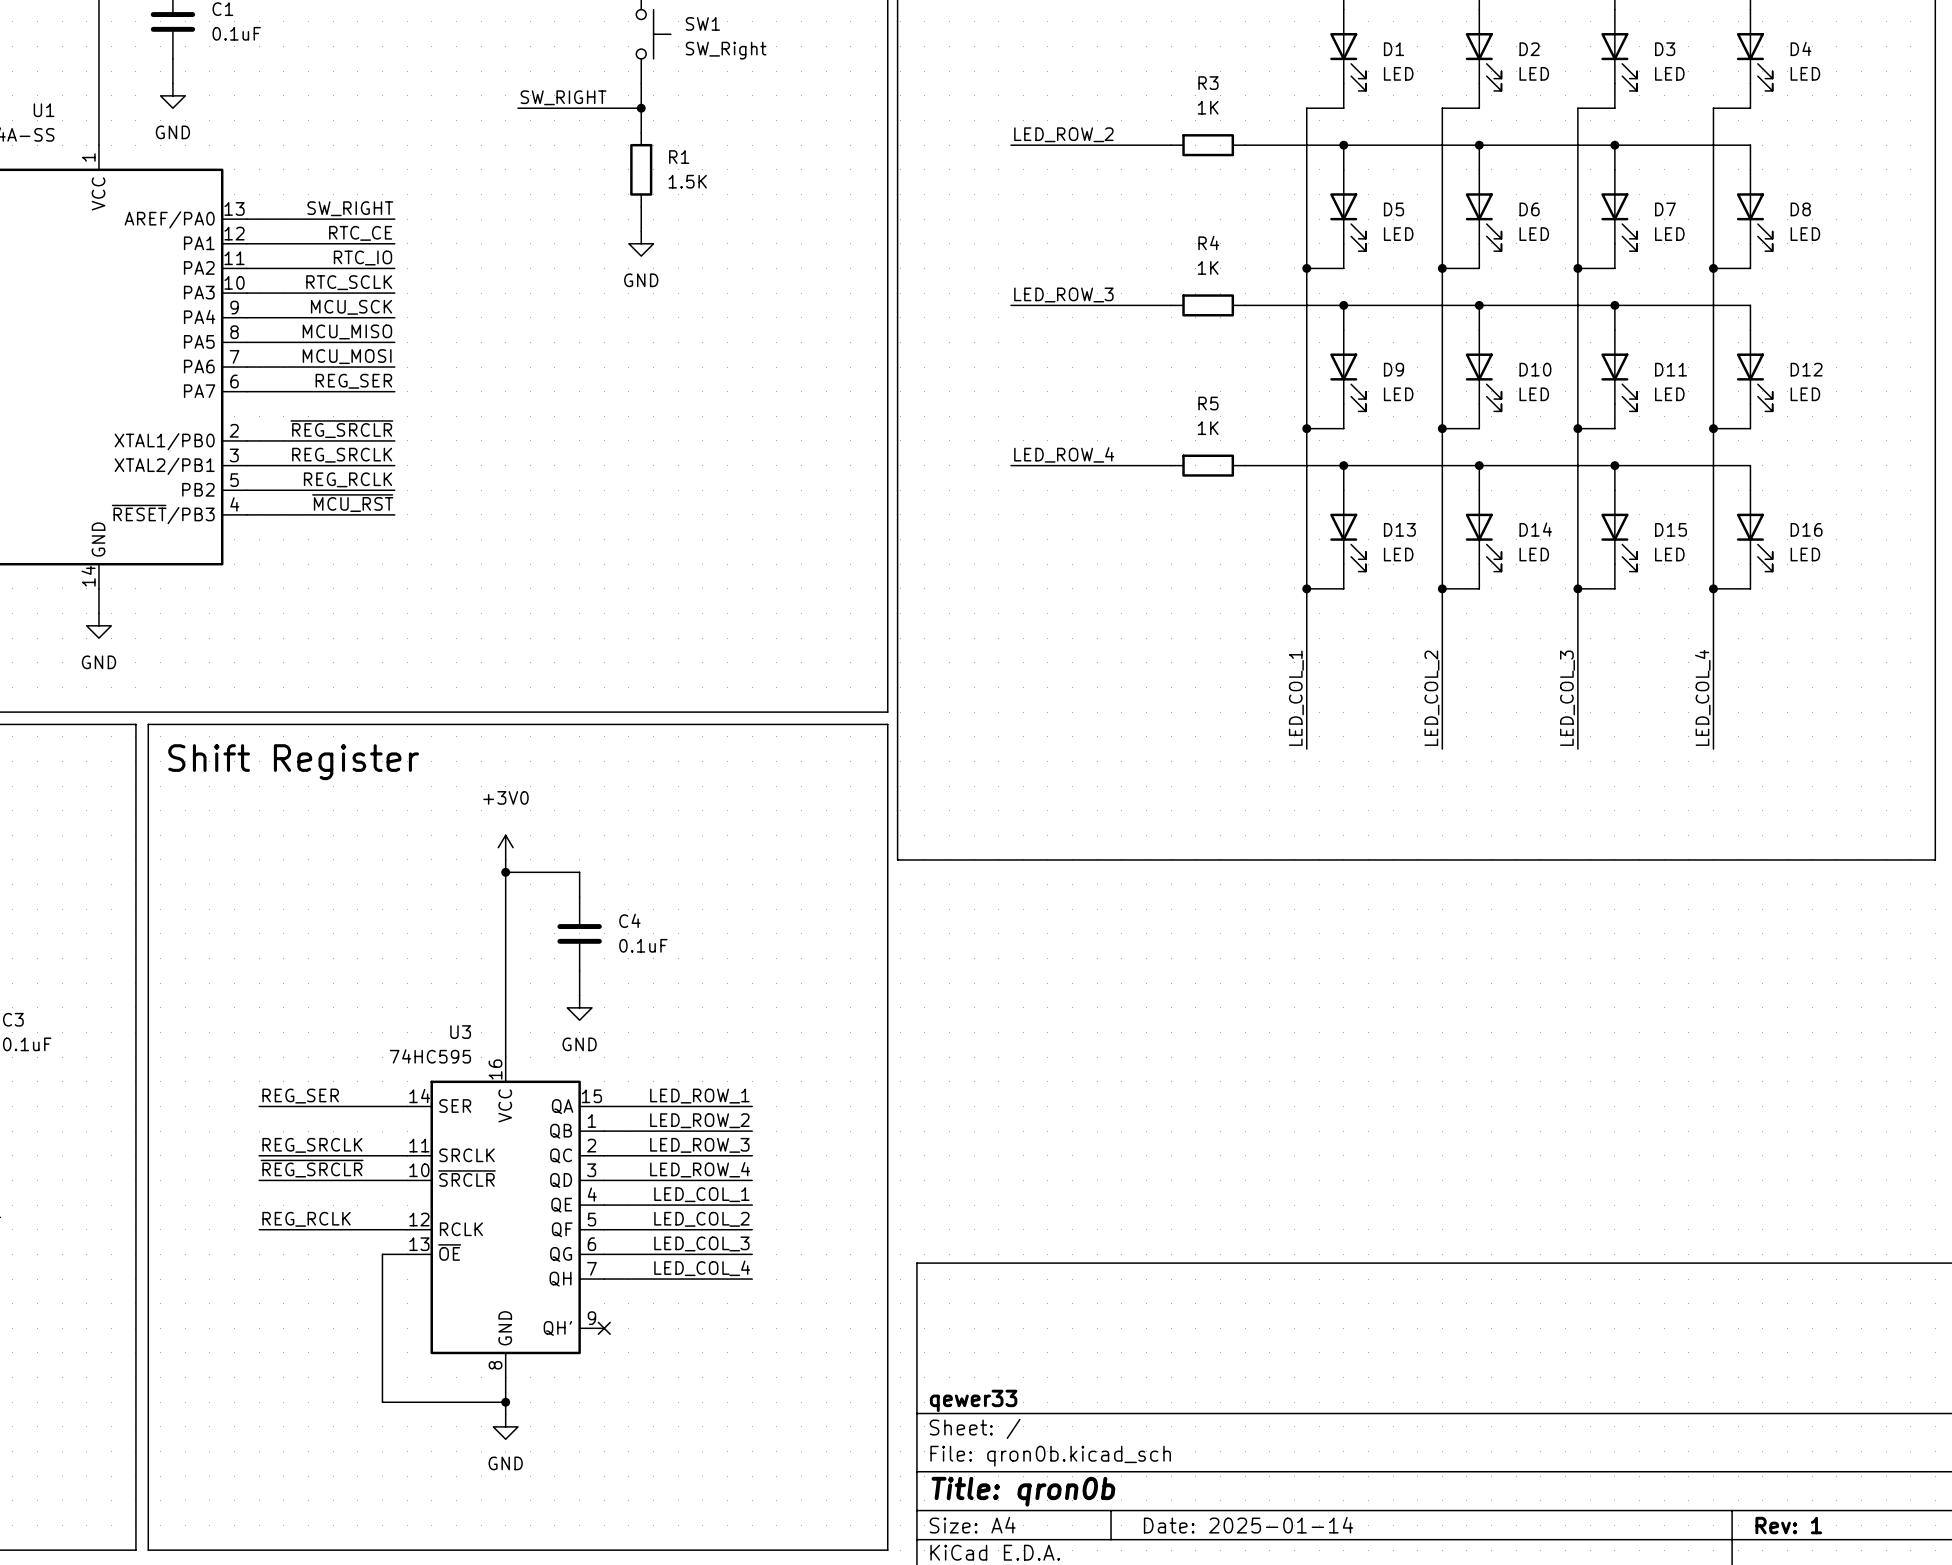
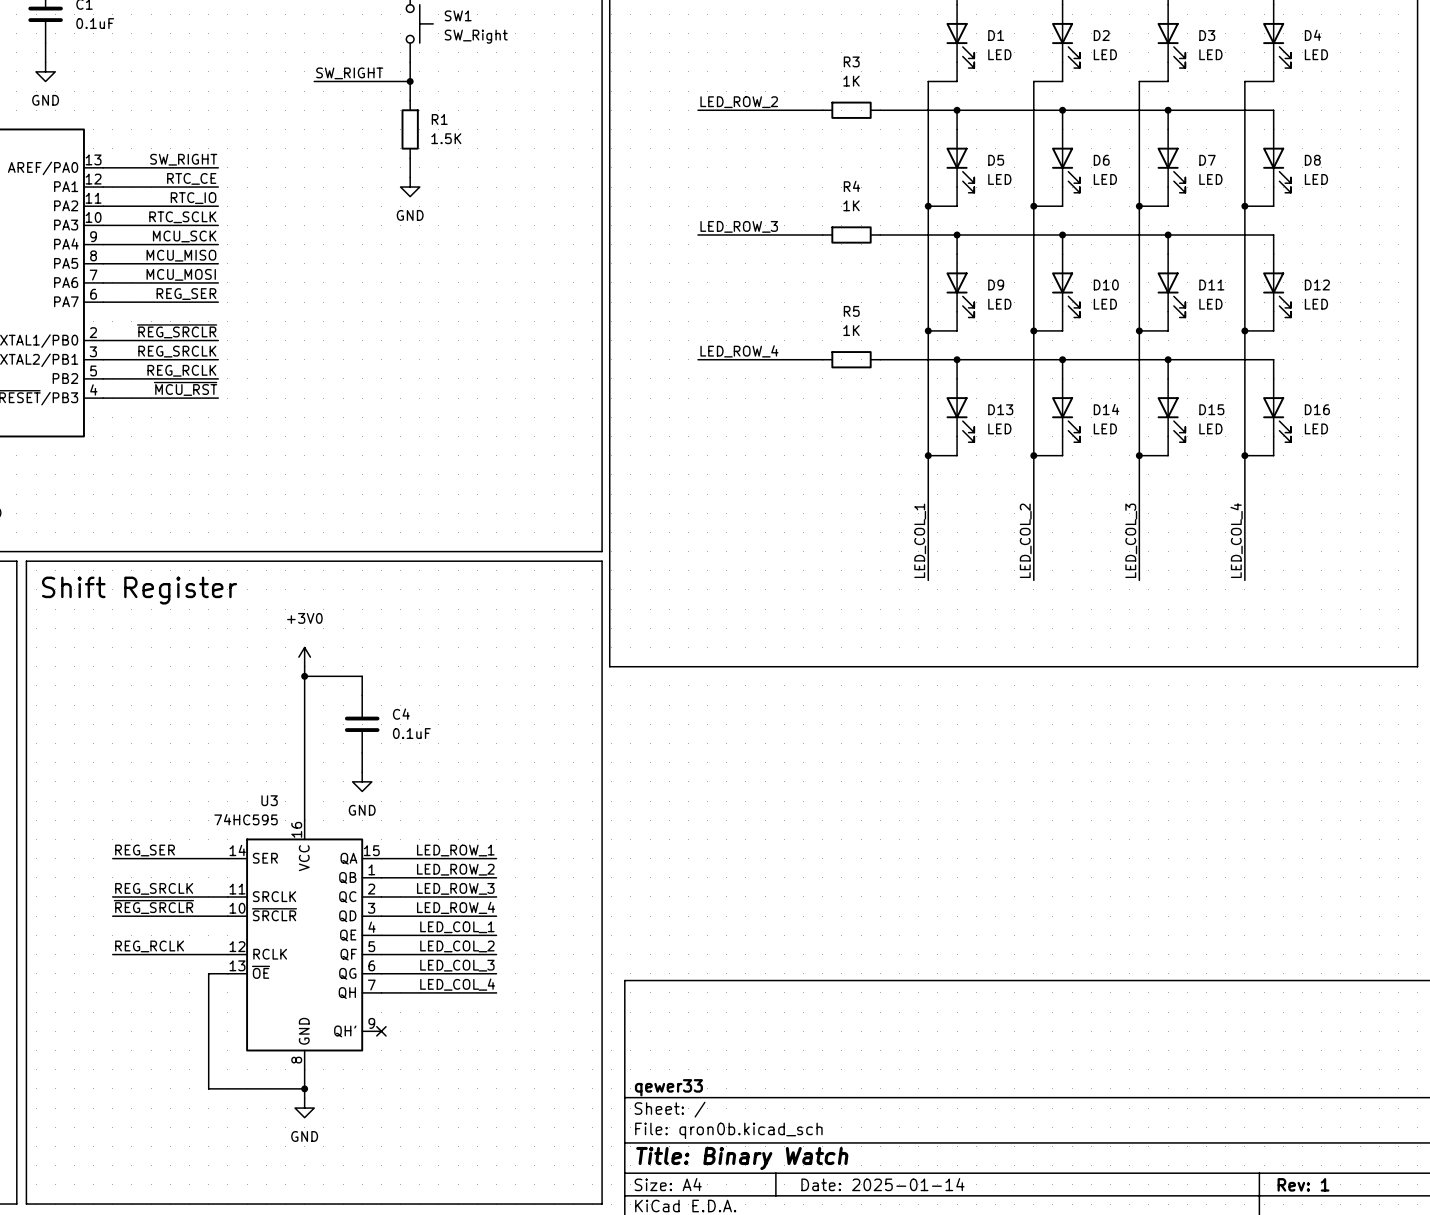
title block: Title: qron0b (1023, 1491) -> Title: Binary Watch (742, 1158)

